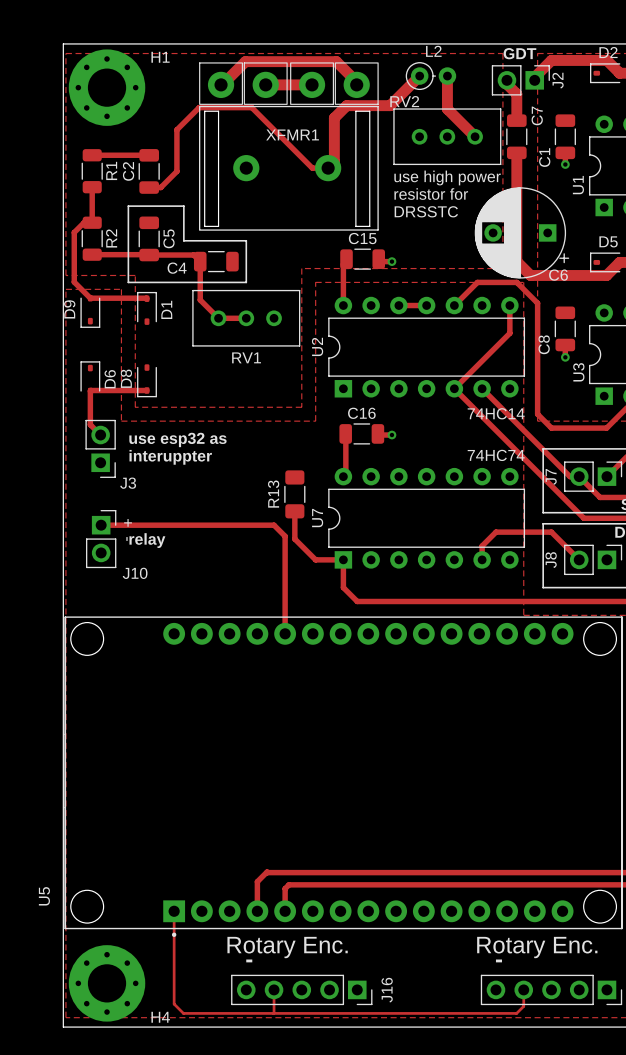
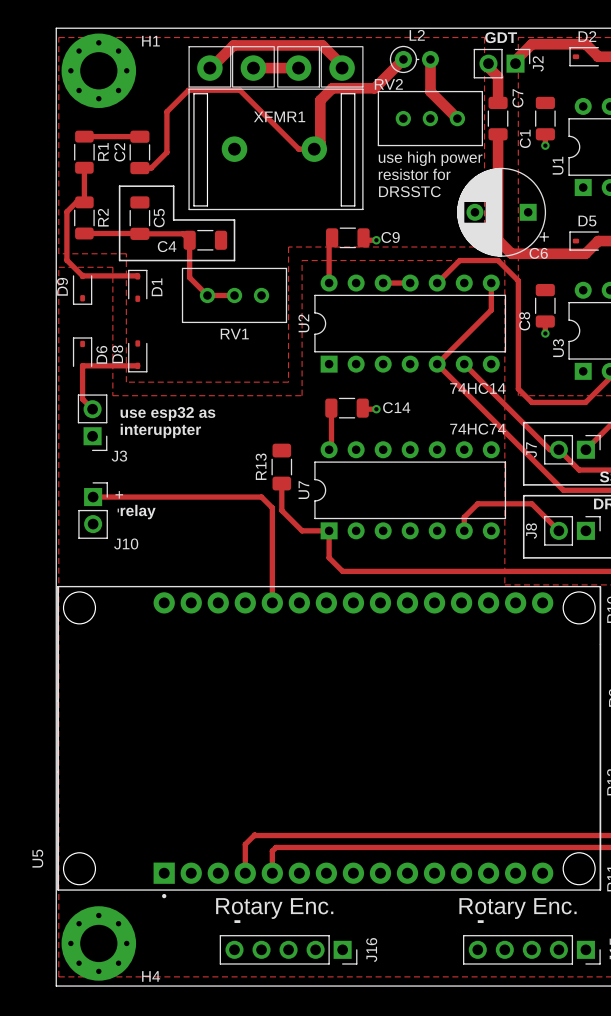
C15 name: C15 (362, 238) -> C9 (390, 237)
C16 name: C16 (361, 413) -> C14 (396, 407)
track: (174, 911) (174, 1004) (183, 1013) (516, 1013) (523, 1006) (523, 989) -> none
track: (274, 989) (273, 1013) -> none

